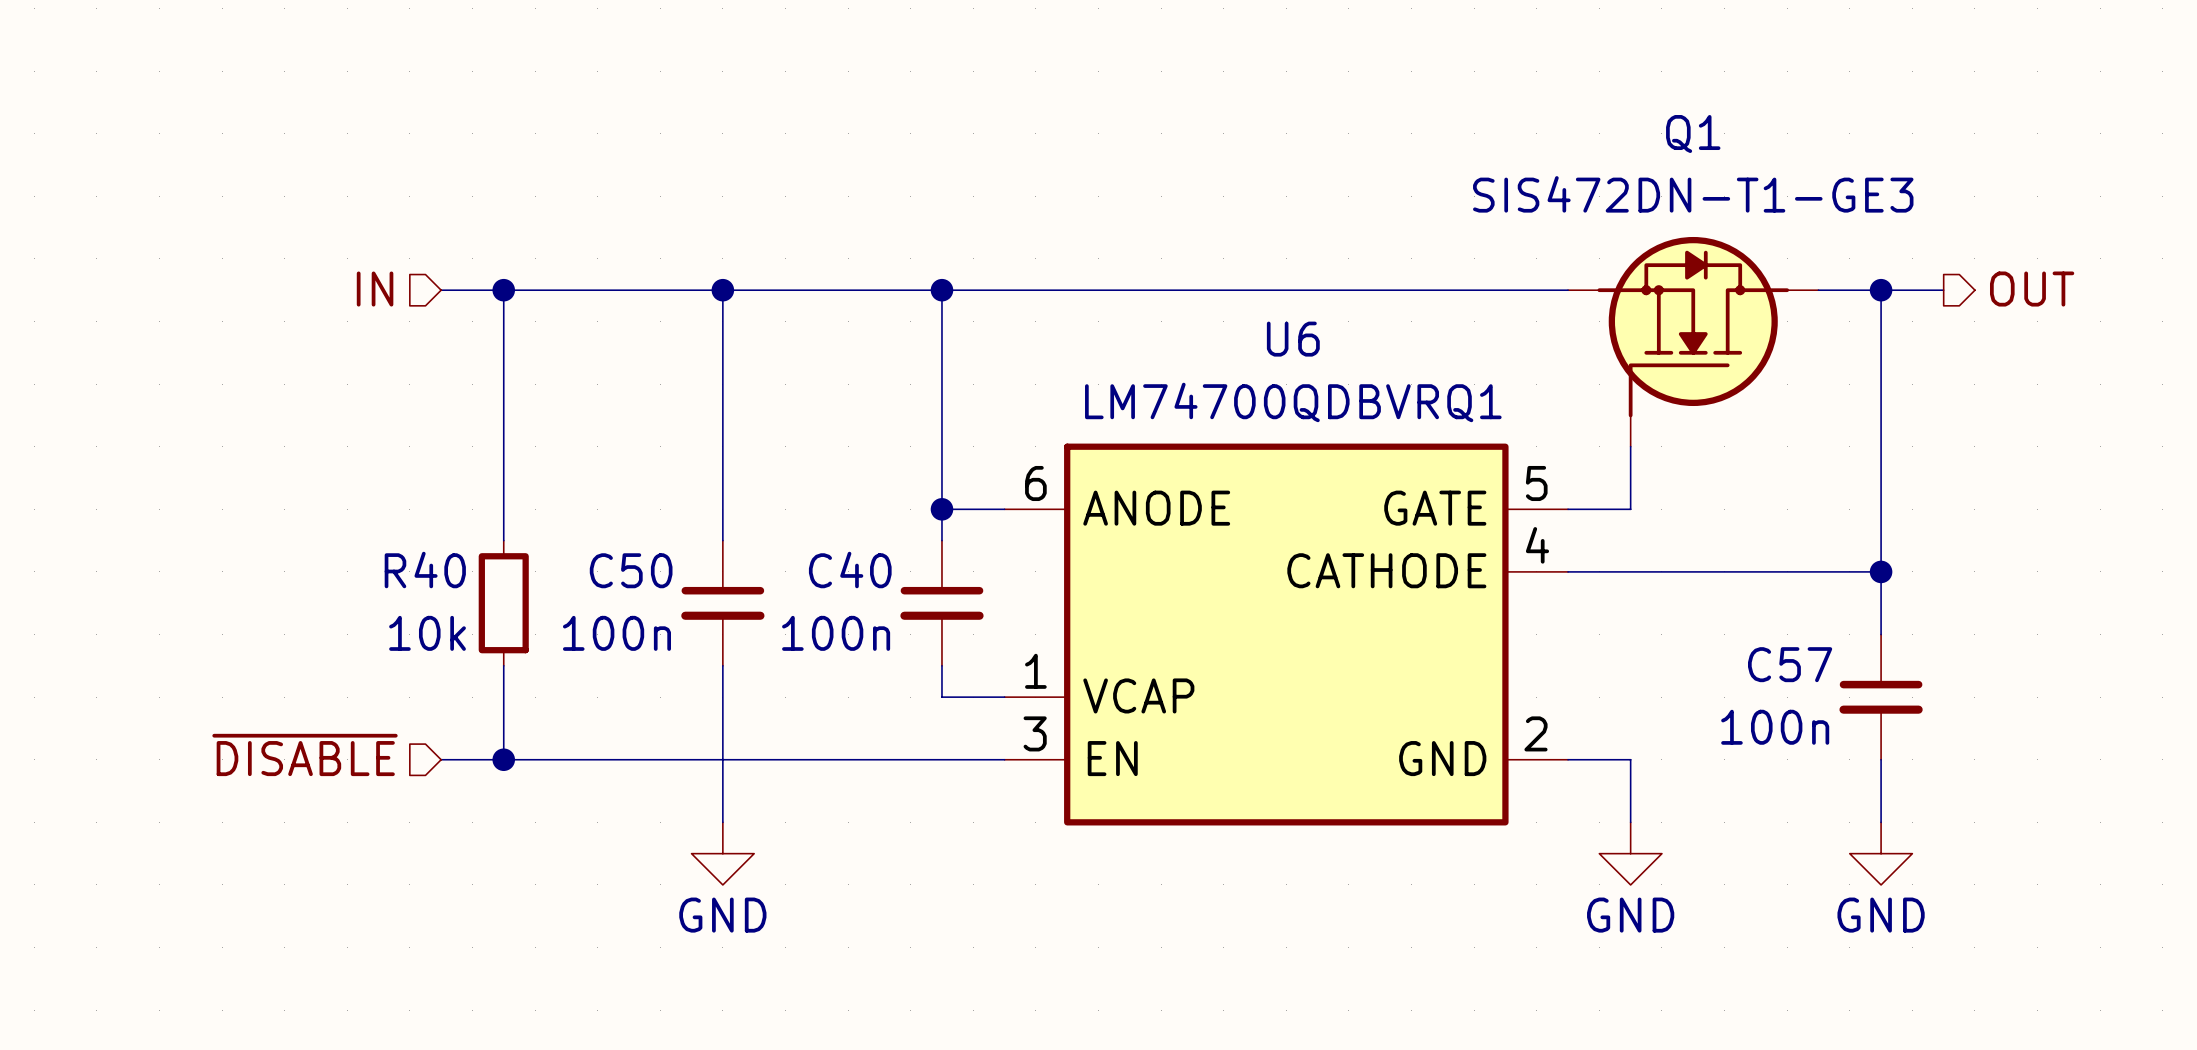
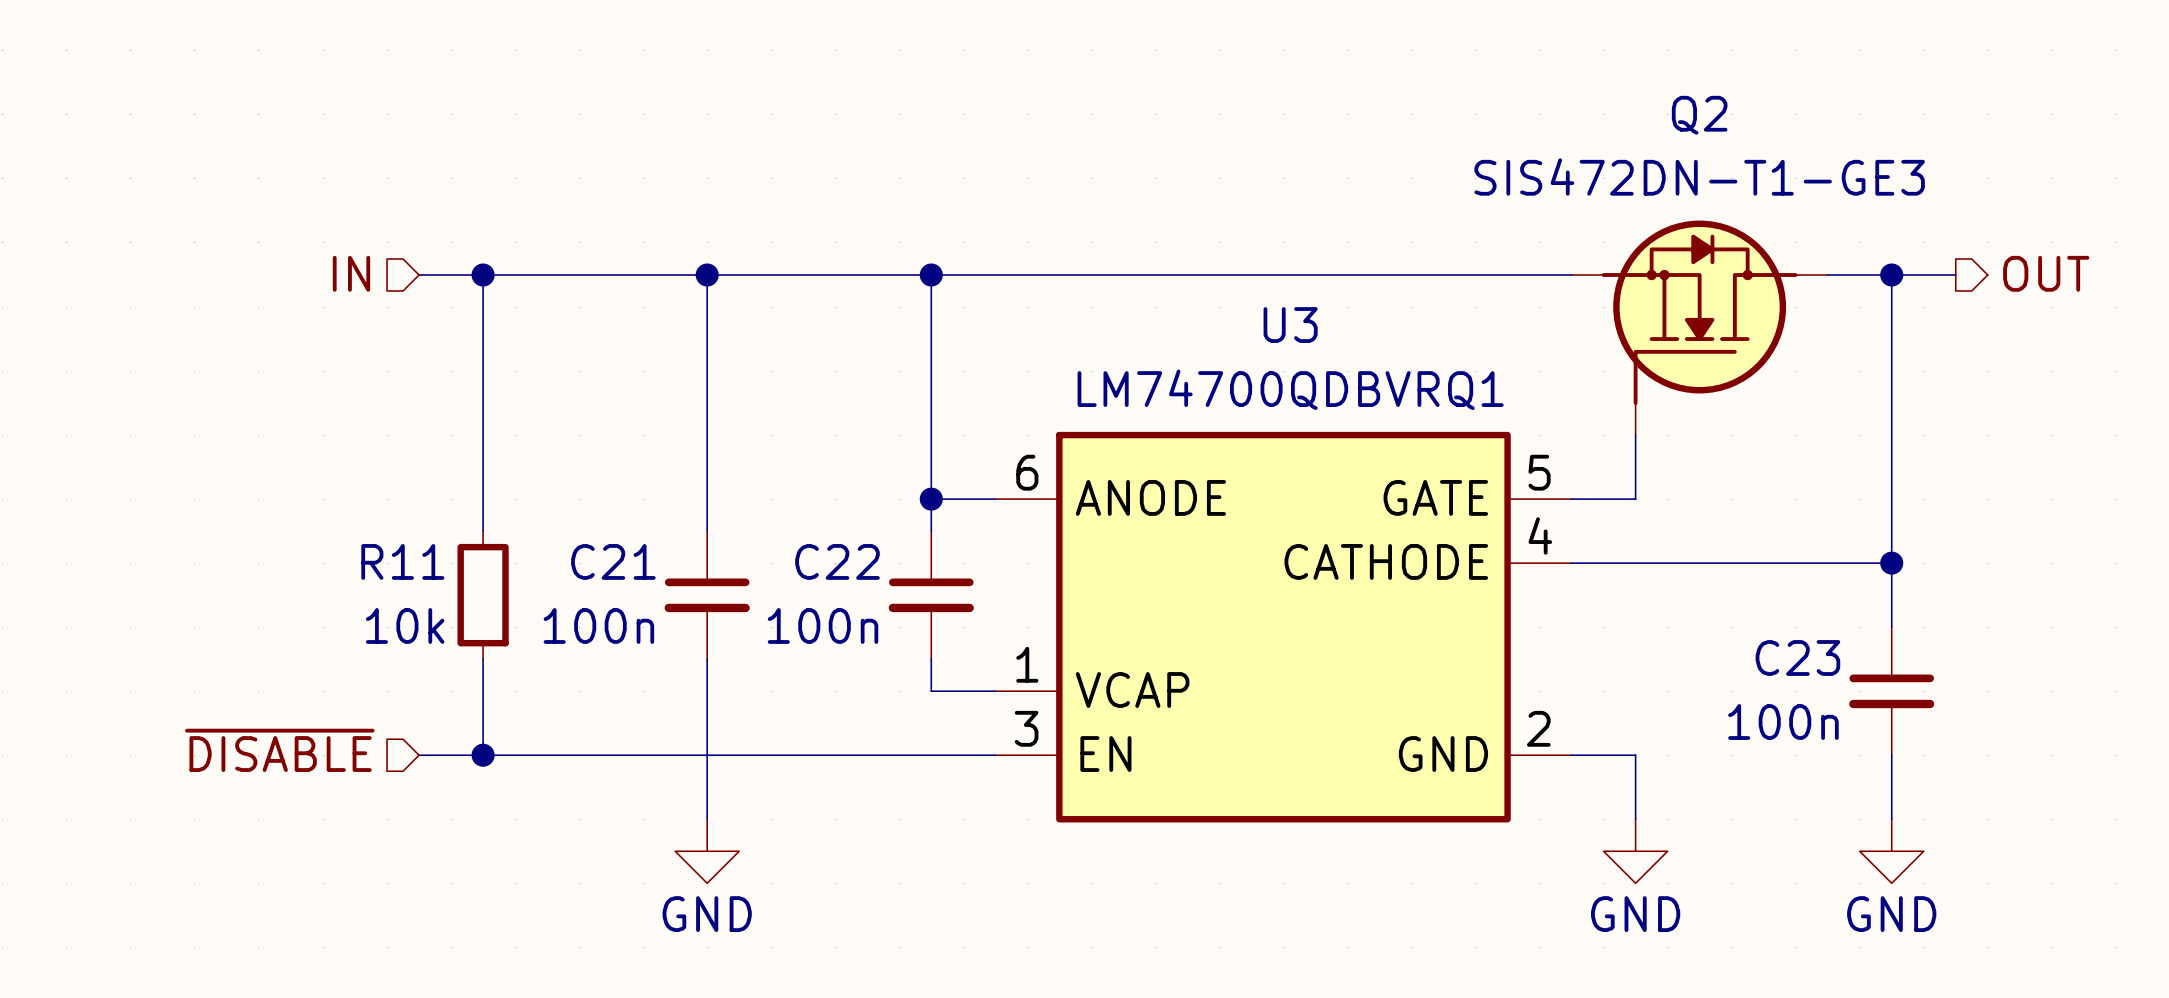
Q1 name: Q1 (1693, 134) -> Q2 (1699, 115)
U6 name: U6 (1293, 339) -> U3 (1290, 325)
R40 name: R40 (425, 570) -> R11 (402, 561)
C50 name: C50 (631, 570) -> C21 (613, 561)
C40 name: C40 (850, 570) -> C22 (837, 561)
C57 name: C57 (1790, 664) -> C23 (1797, 657)

